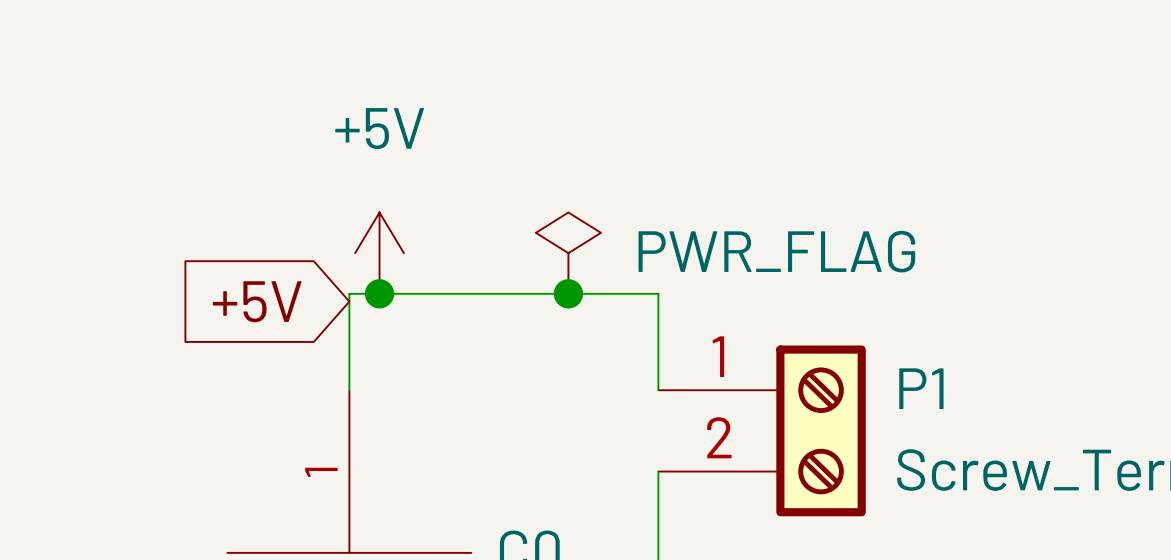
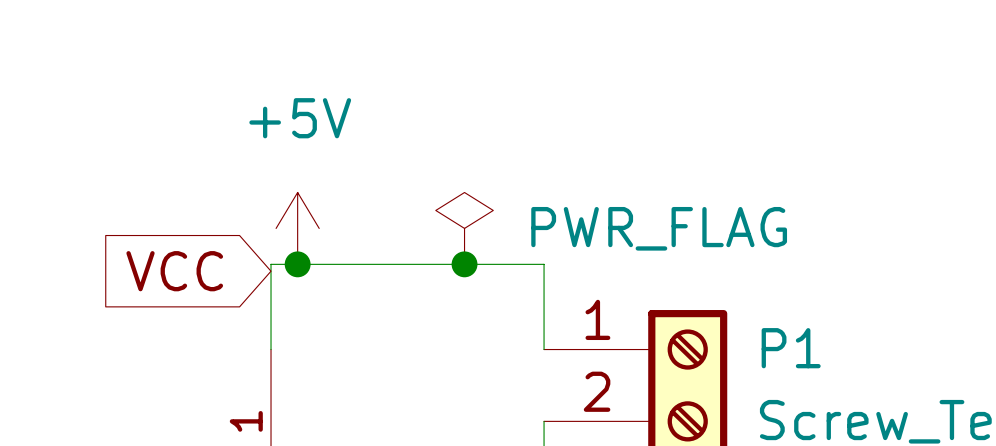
global label: +5V (257, 301) -> VCC (174, 271)

